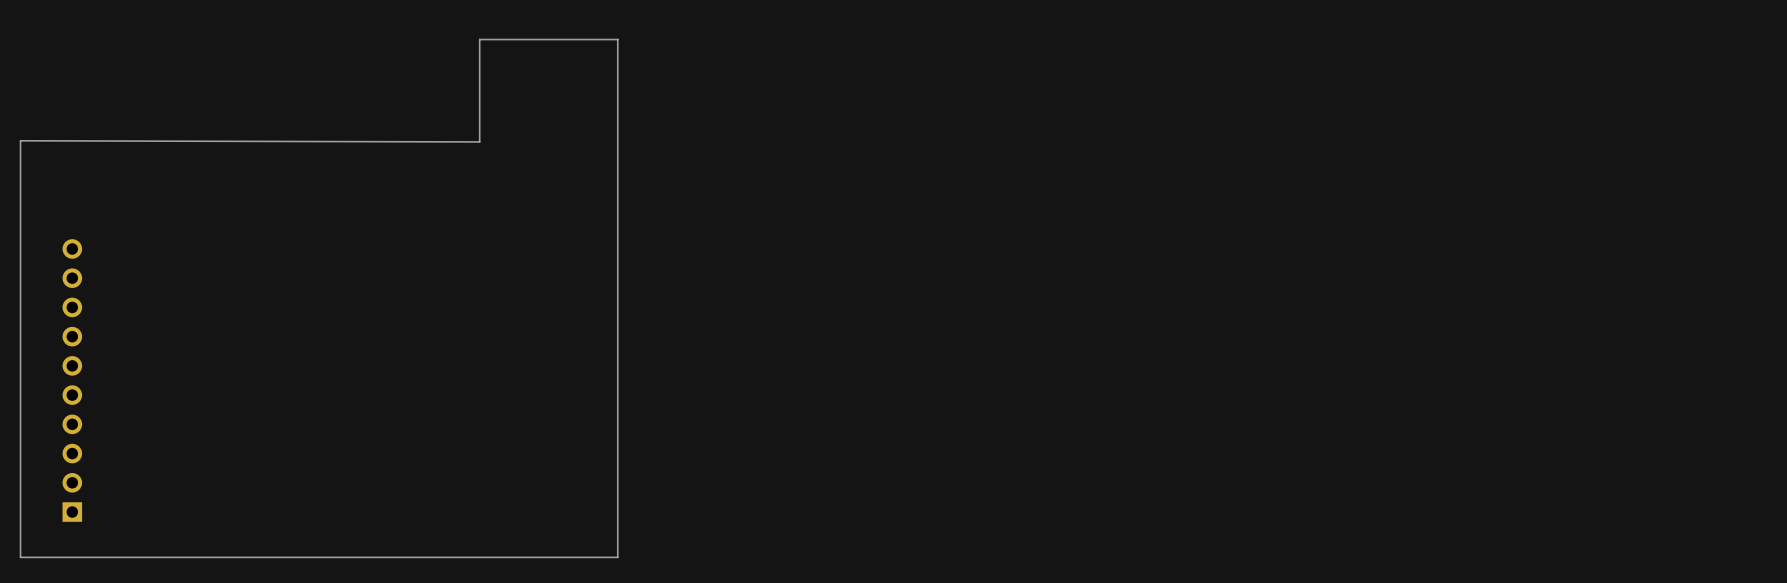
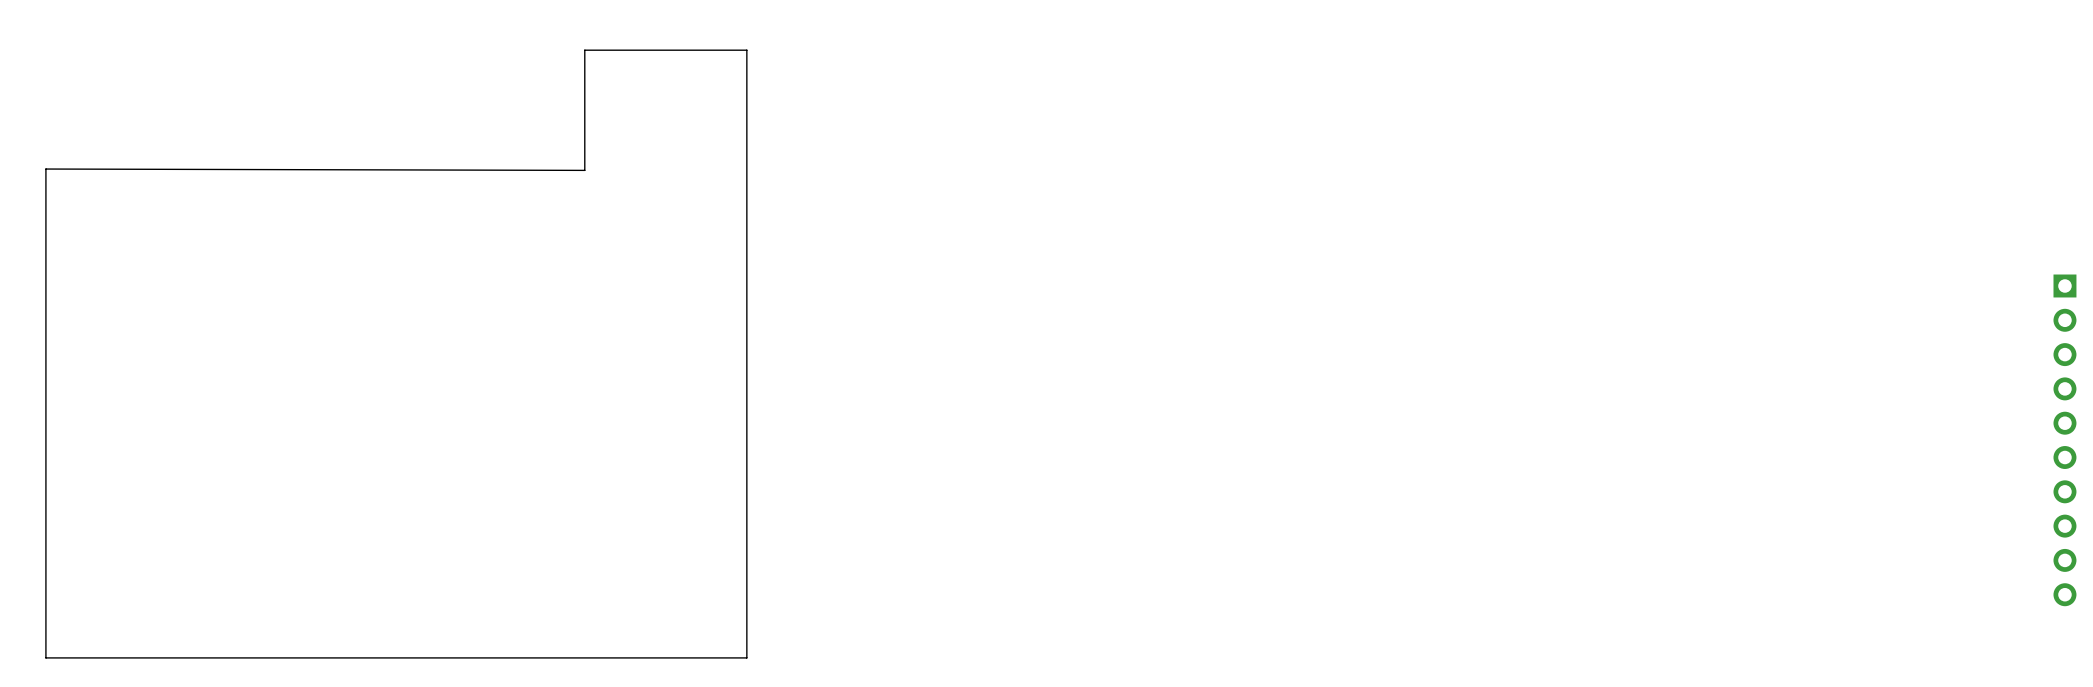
part: none -> (2064, 440)
part: (72, 380) -> none

